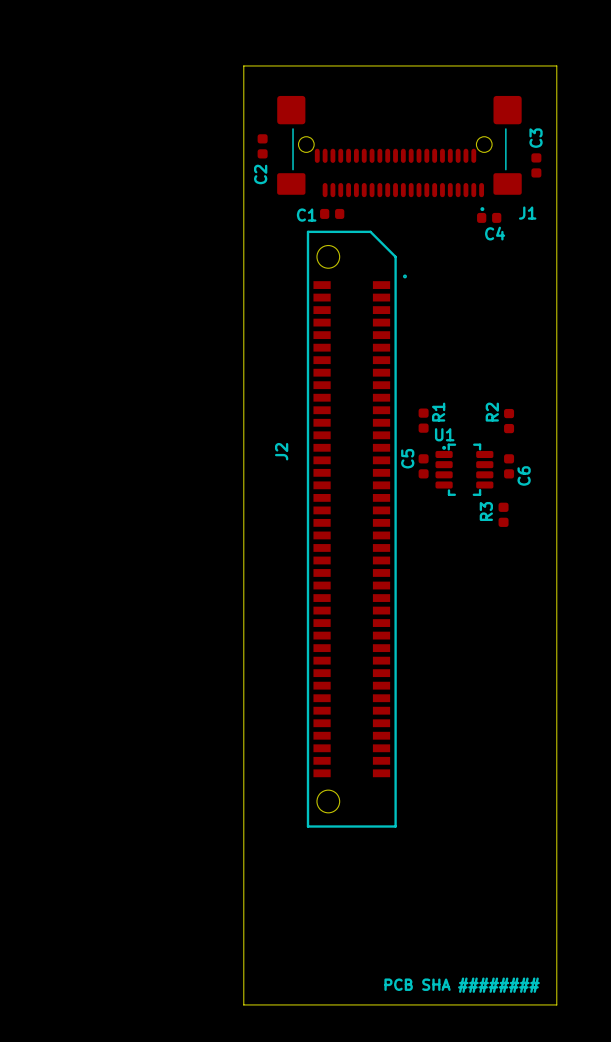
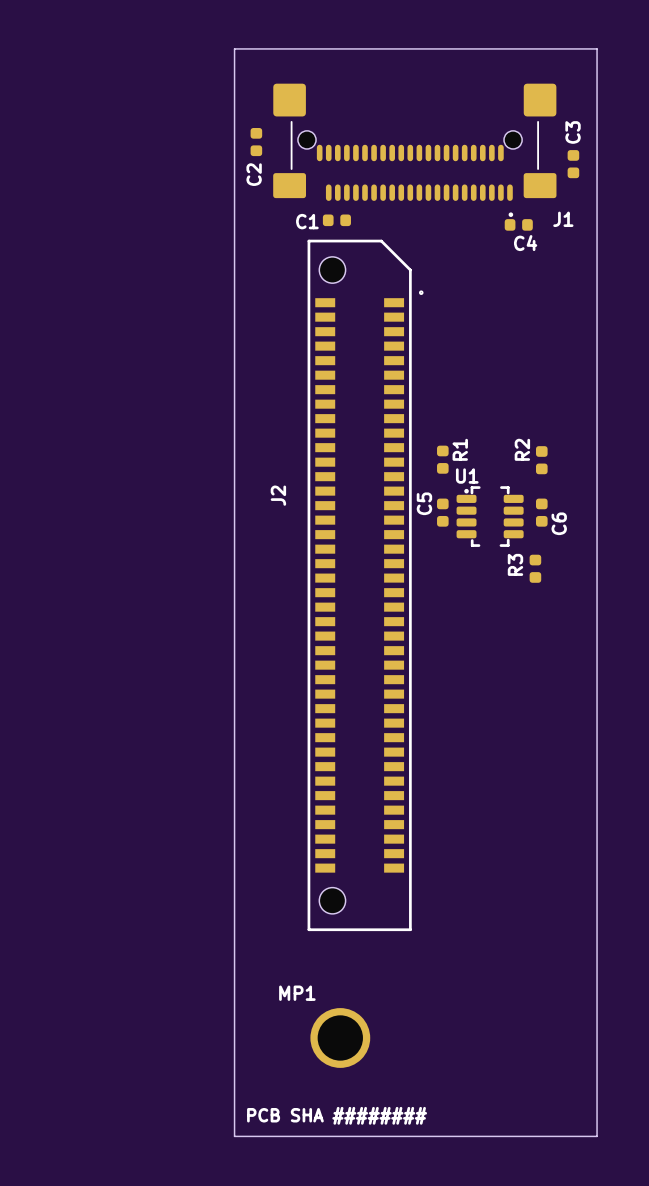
MP1: none -> (340, 1037)
text position: PCB SHA ######## (462, 985) -> PCB SHA ######## (337, 1115)

